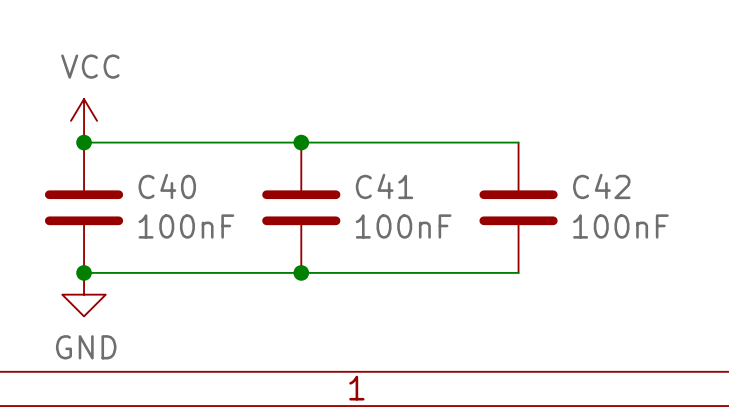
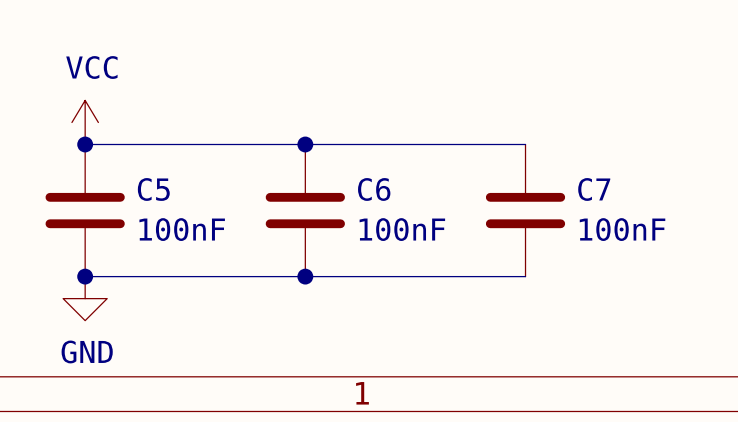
C40 name: C40 (167, 186) -> C5 (153, 189)
C41 name: C41 (384, 186) -> C6 (374, 189)
C42 name: C42 (601, 186) -> C7 (594, 189)

